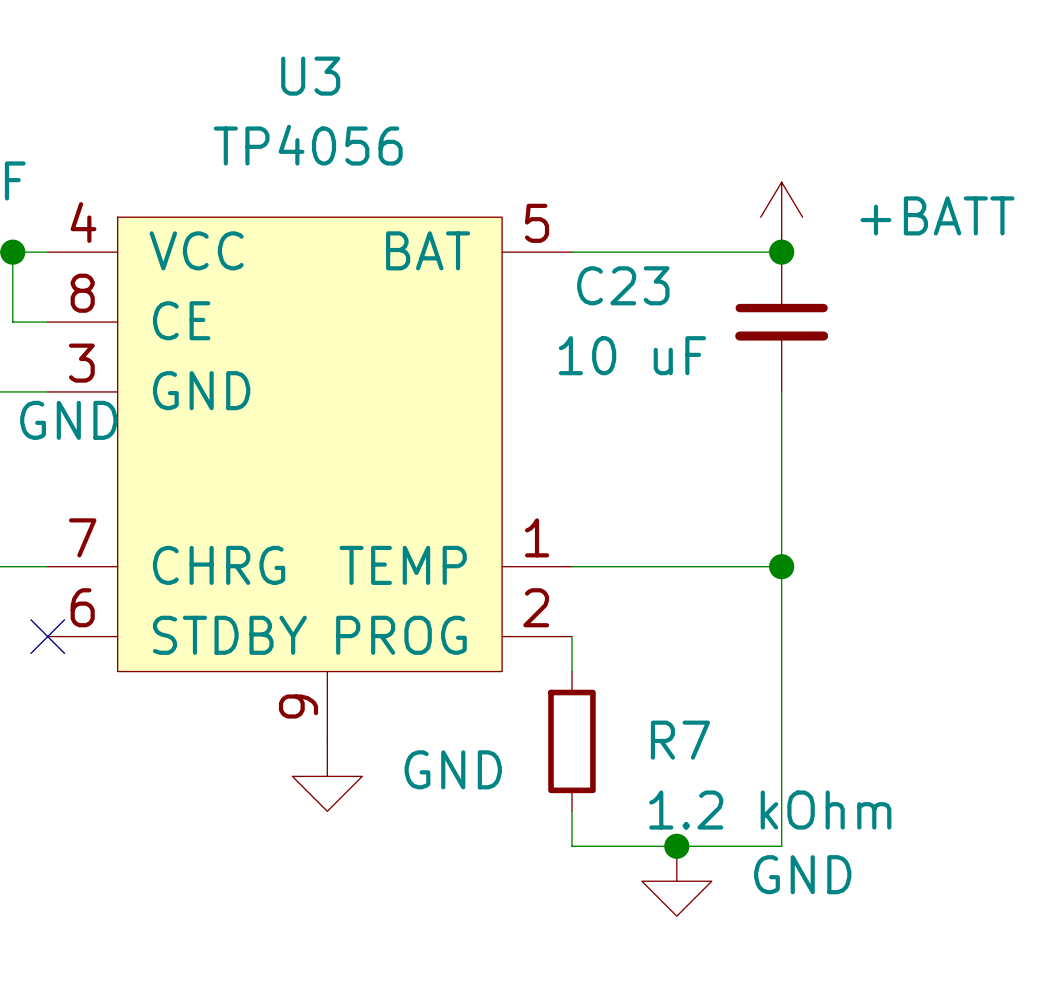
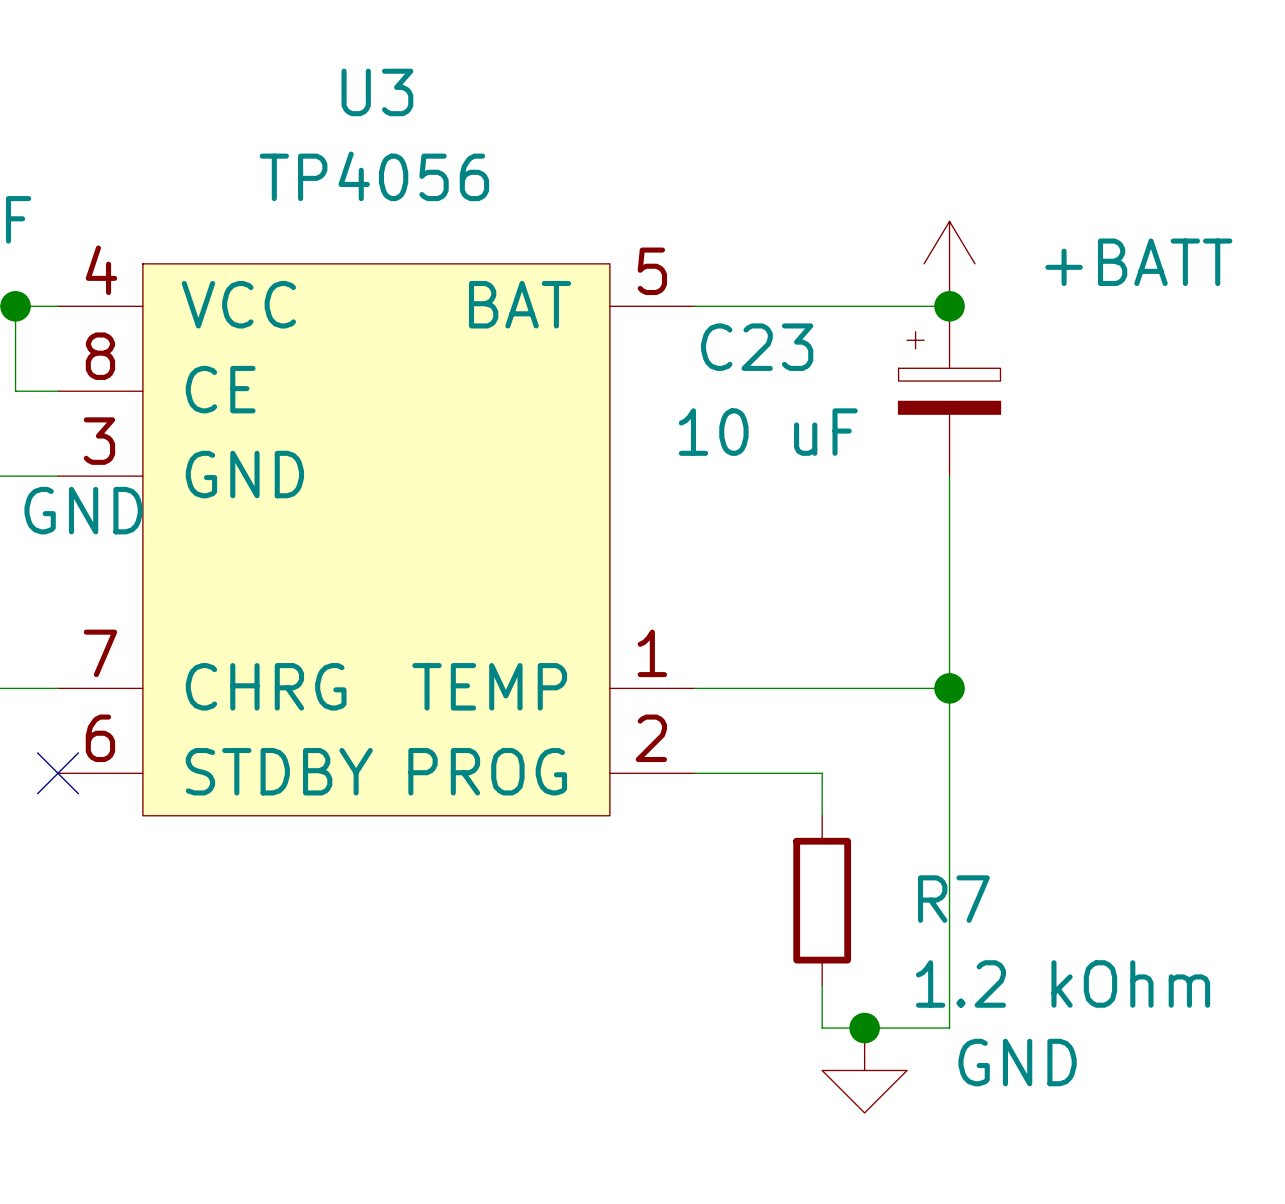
U3 symbol: [47, 217, 572, 742] -> [58, 263, 695, 816]
C23 symbol: [735, 252, 829, 392] -> [898, 306, 1001, 477]
wire: (571, 636) (571, 671) -> (694, 773) (822, 773) (822, 815)
R7 position: (571, 741) -> (822, 900)
power symbol: GND (327, 776) -> none
wire: (571, 811) (571, 846) (676, 846) -> (822, 985) (822, 1028)
junction position: (676, 846) -> (864, 1028)
power symbol position: GND (676, 881) -> GND (864, 1070)

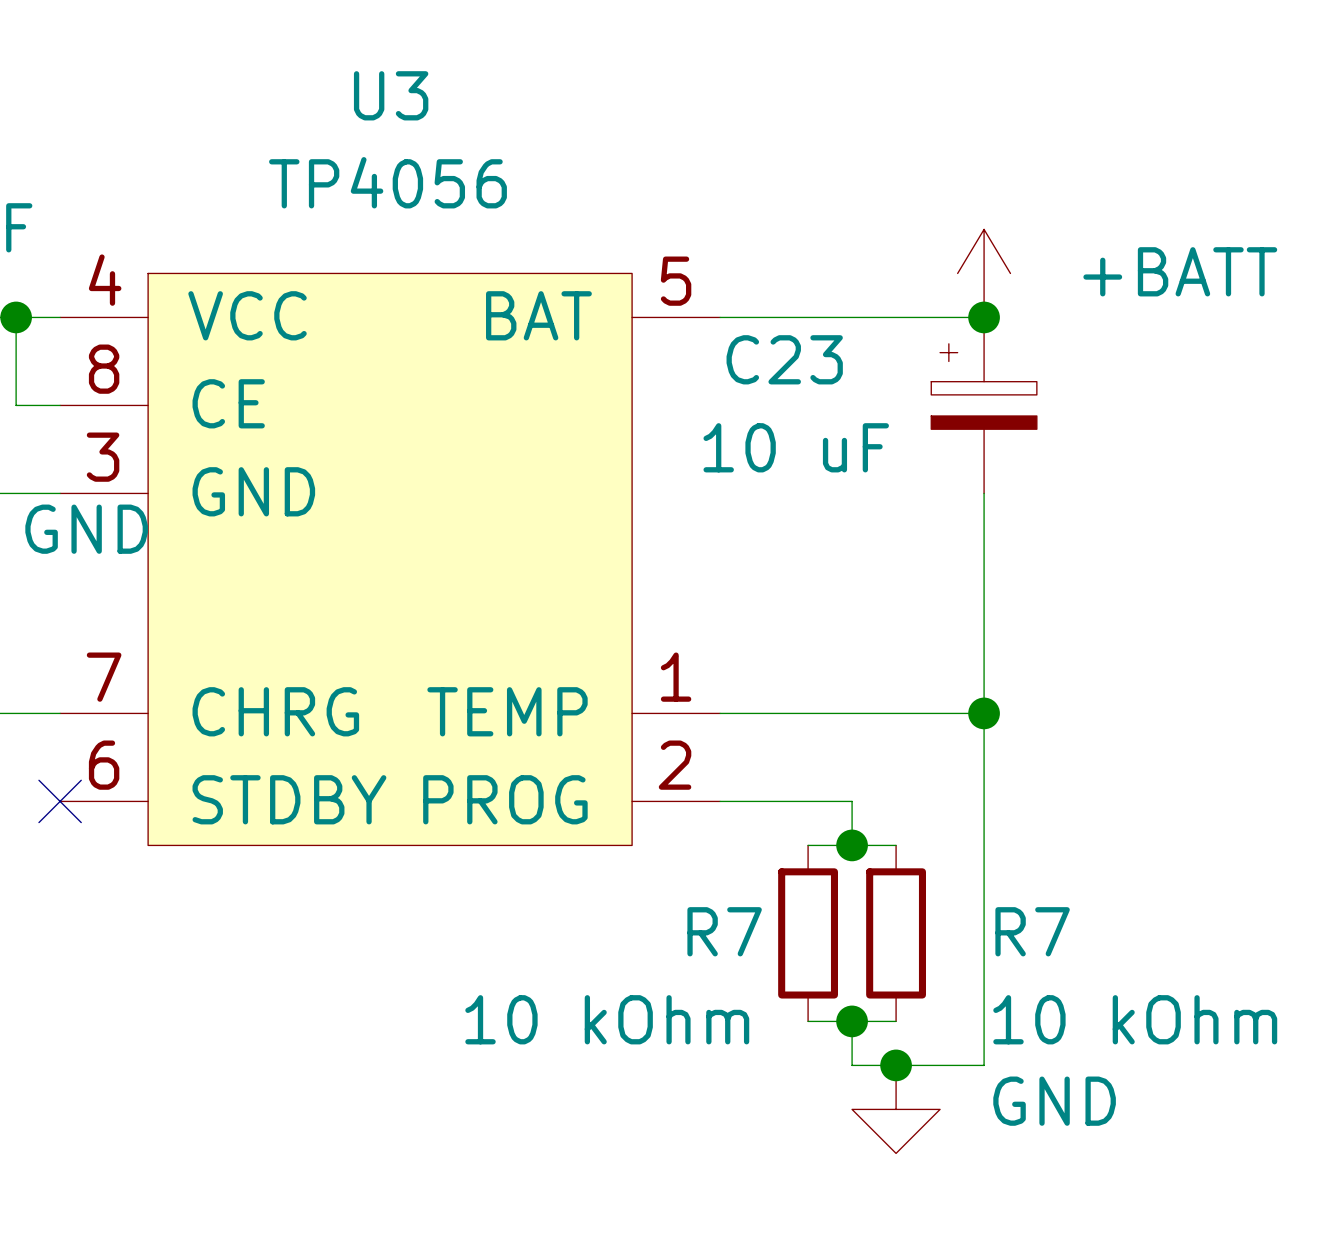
wire: none -> (808, 845) (896, 845)
junction: none -> (852, 845)
R7: none -> 10 kOhm (808, 933)
R7: 1.2 kOhm (822, 900) -> none
R7: none -> 10 kOhm (896, 933)
wire: none -> (808, 1021) (896, 1021)
junction: none -> (852, 1021)

